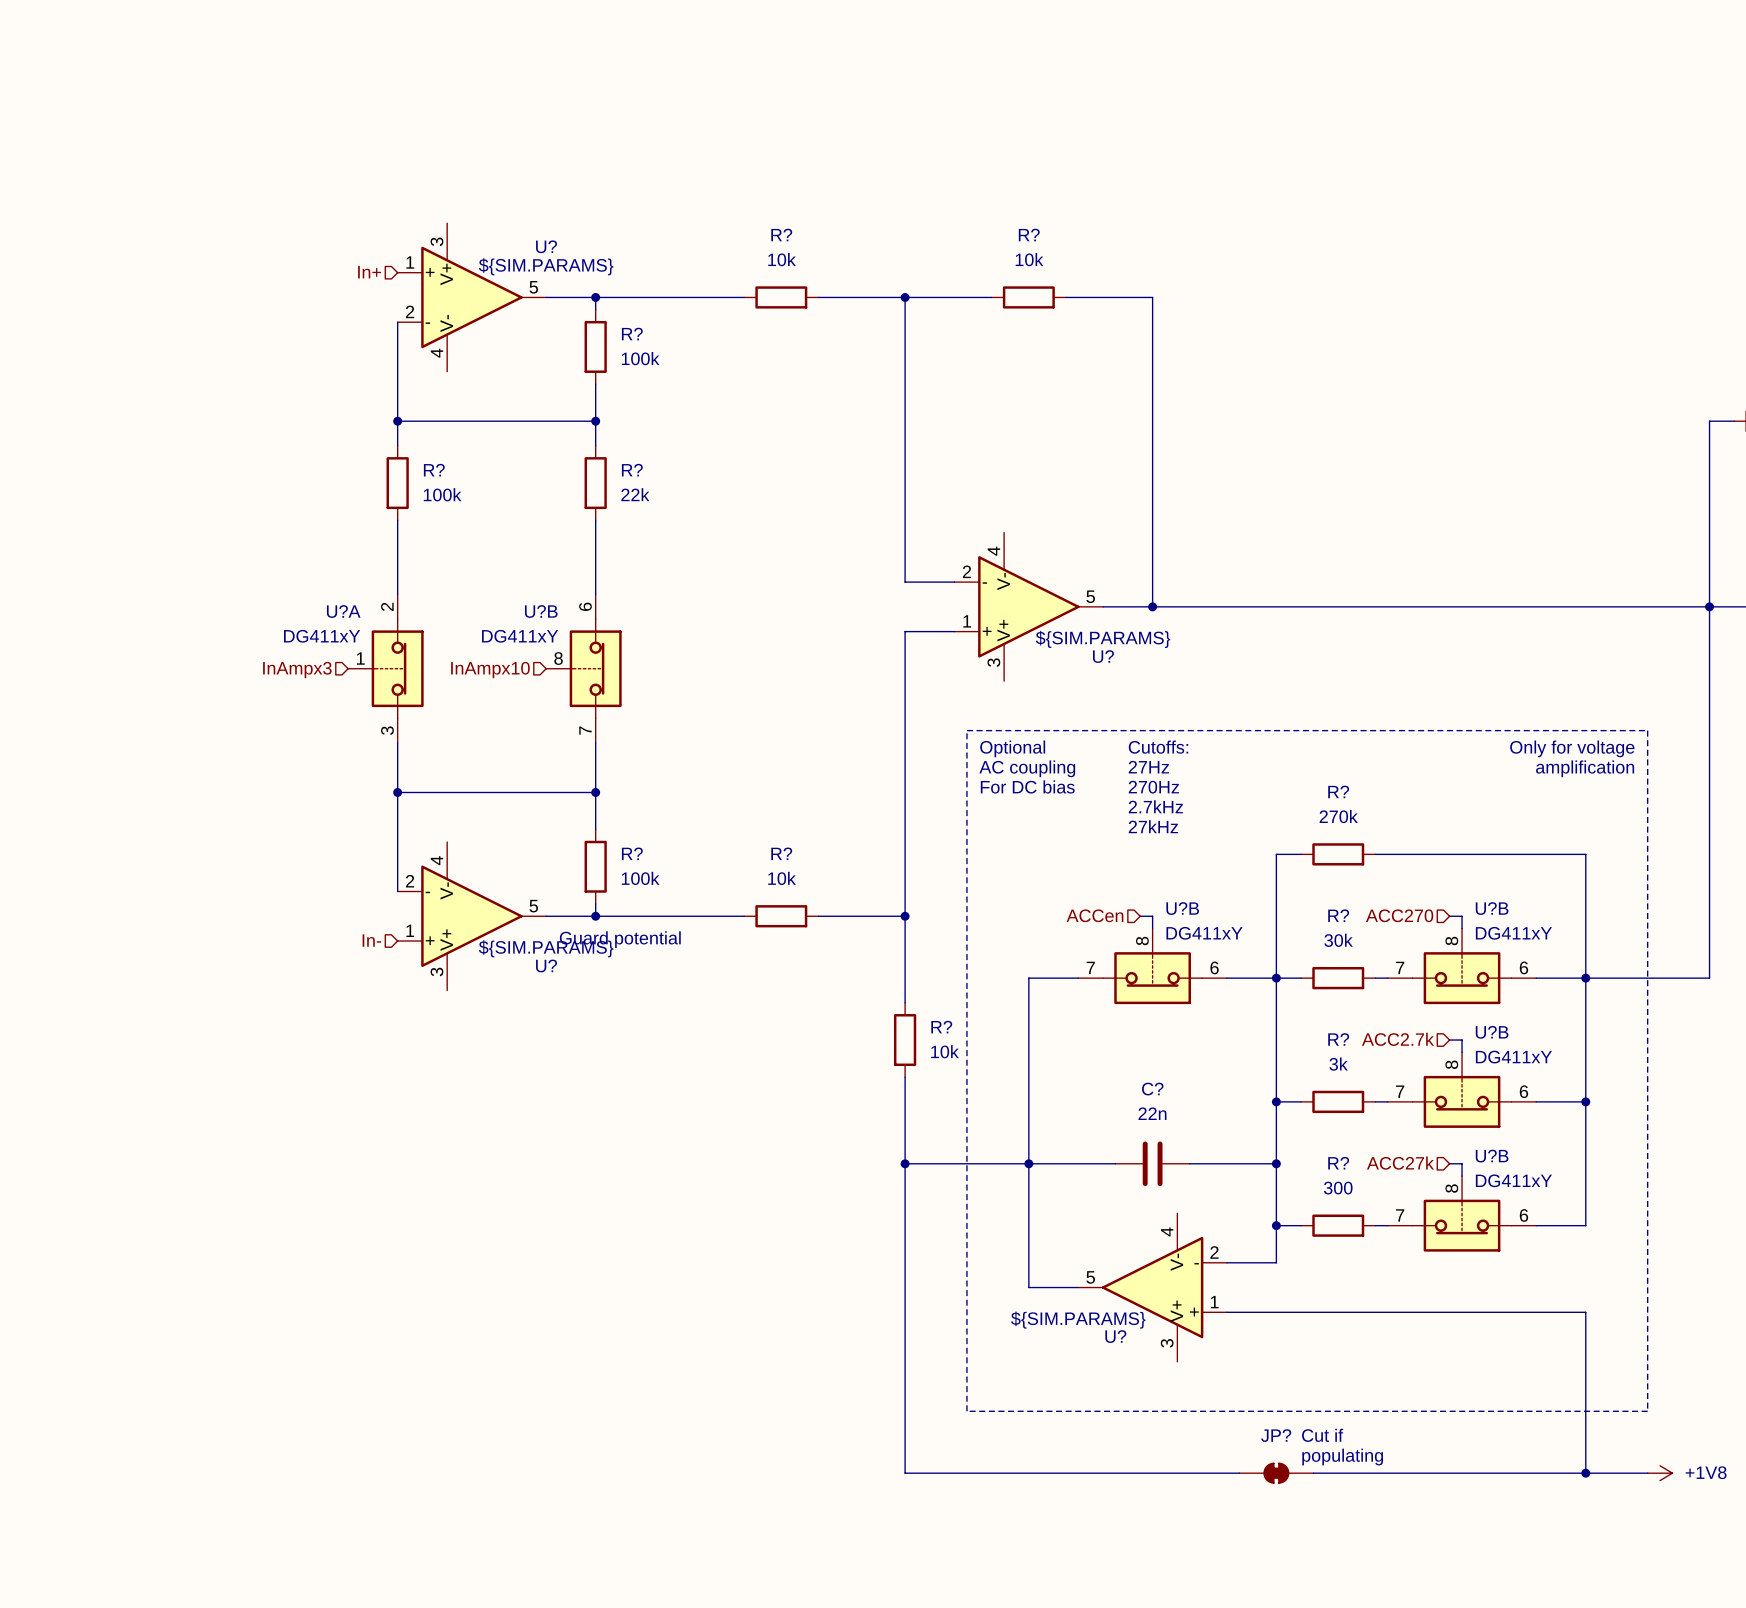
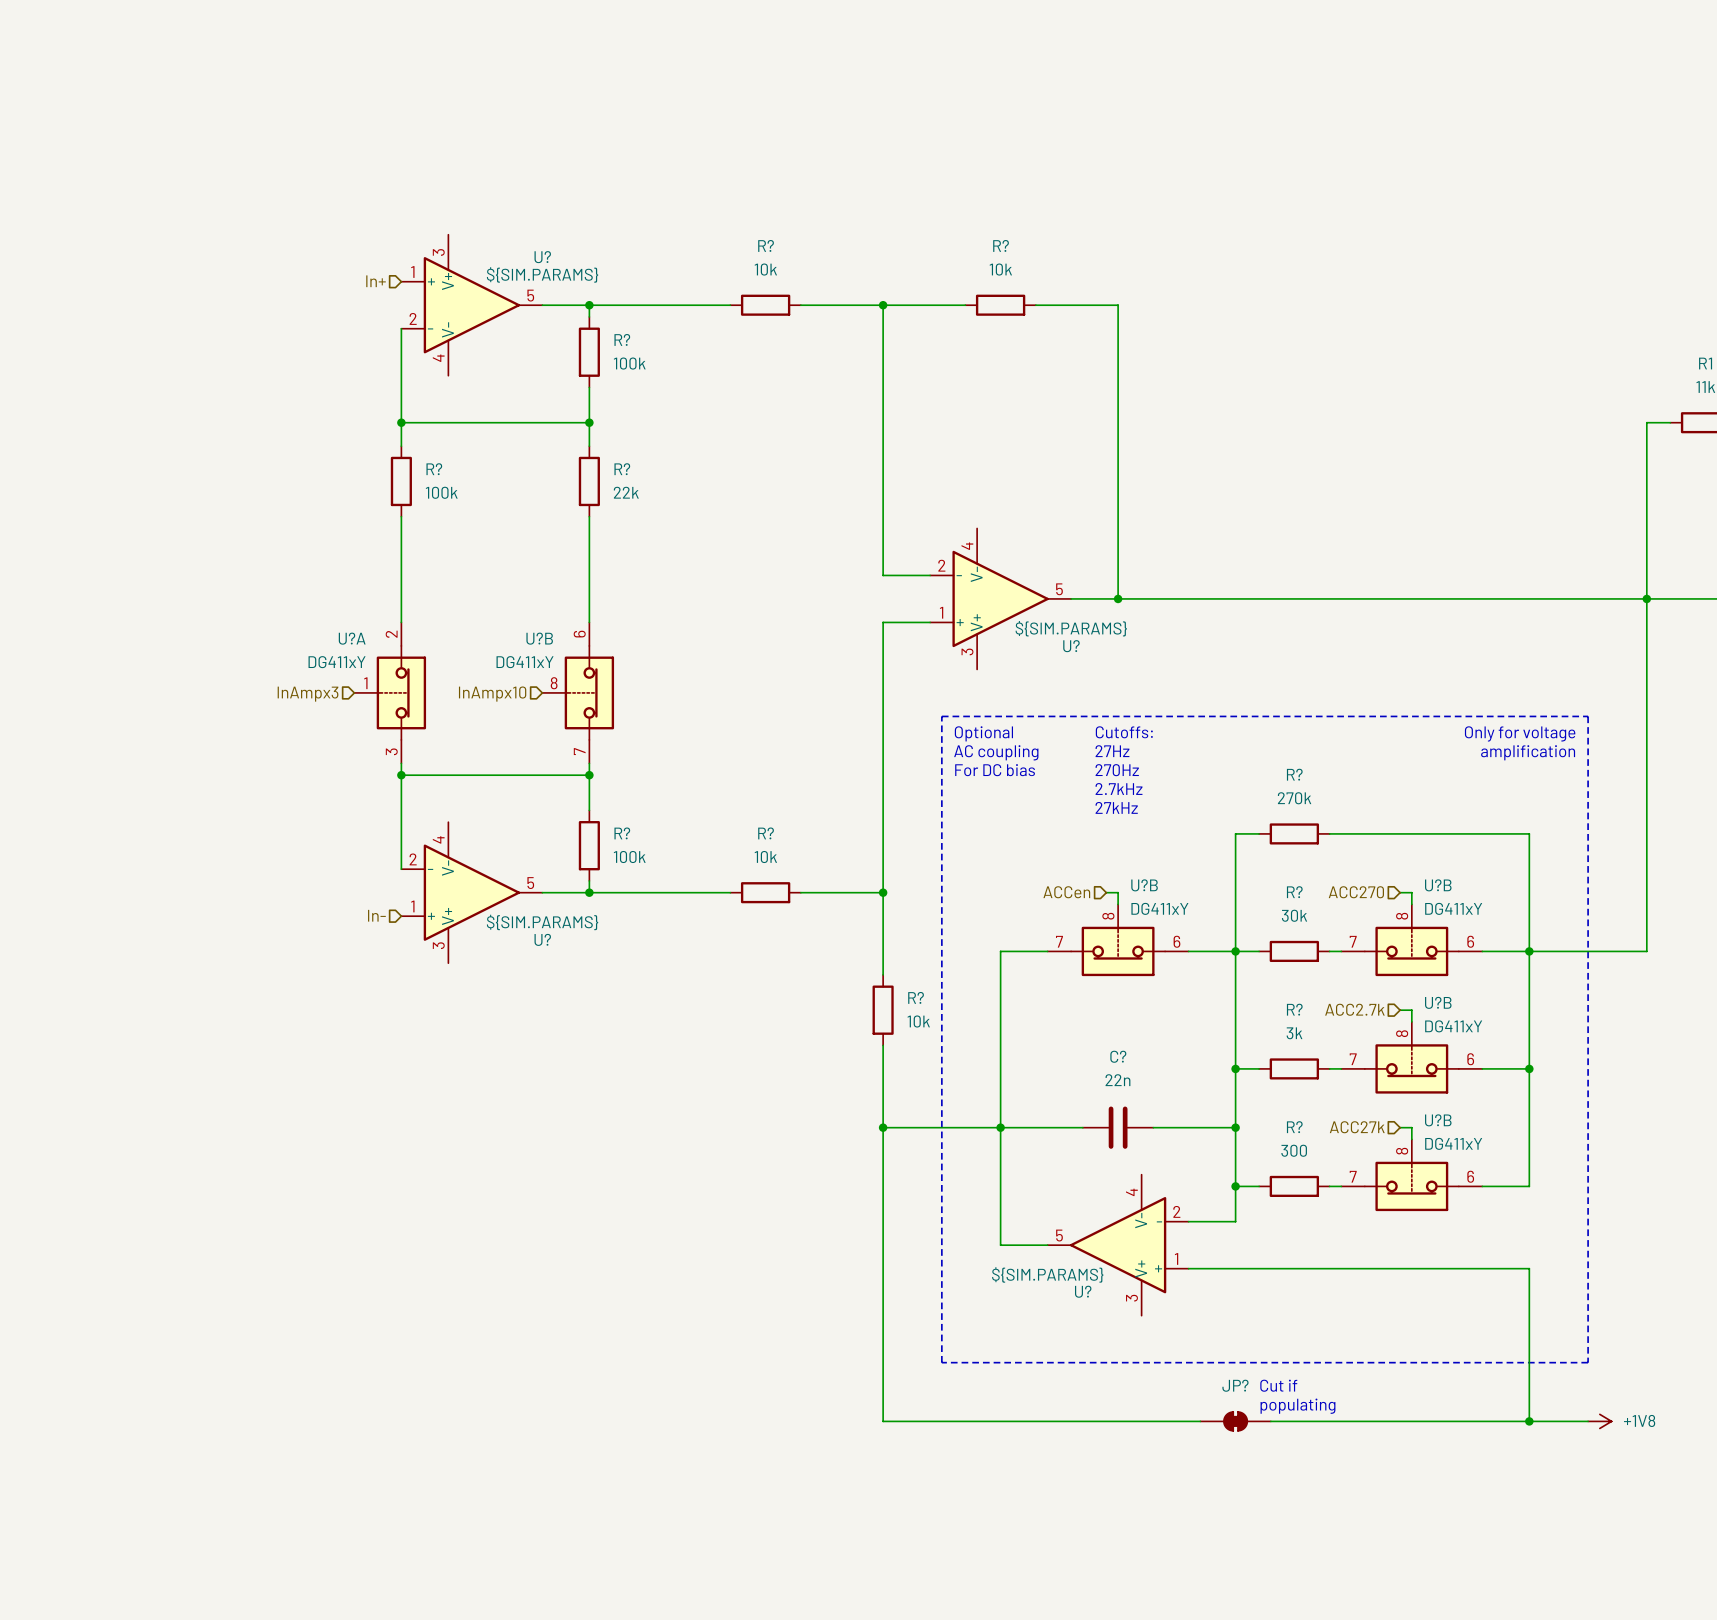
U?A position: (385, 668) -> (390, 692)
U?B position: (583, 668) -> (578, 692)
hierarchical label position: InAmpx3 (297, 670) -> InAmpx3 (308, 694)
hierarchical label position: InAmpx10 (490, 670) -> InAmpx10 (492, 694)
text: Guard potential (620, 939) -> none

